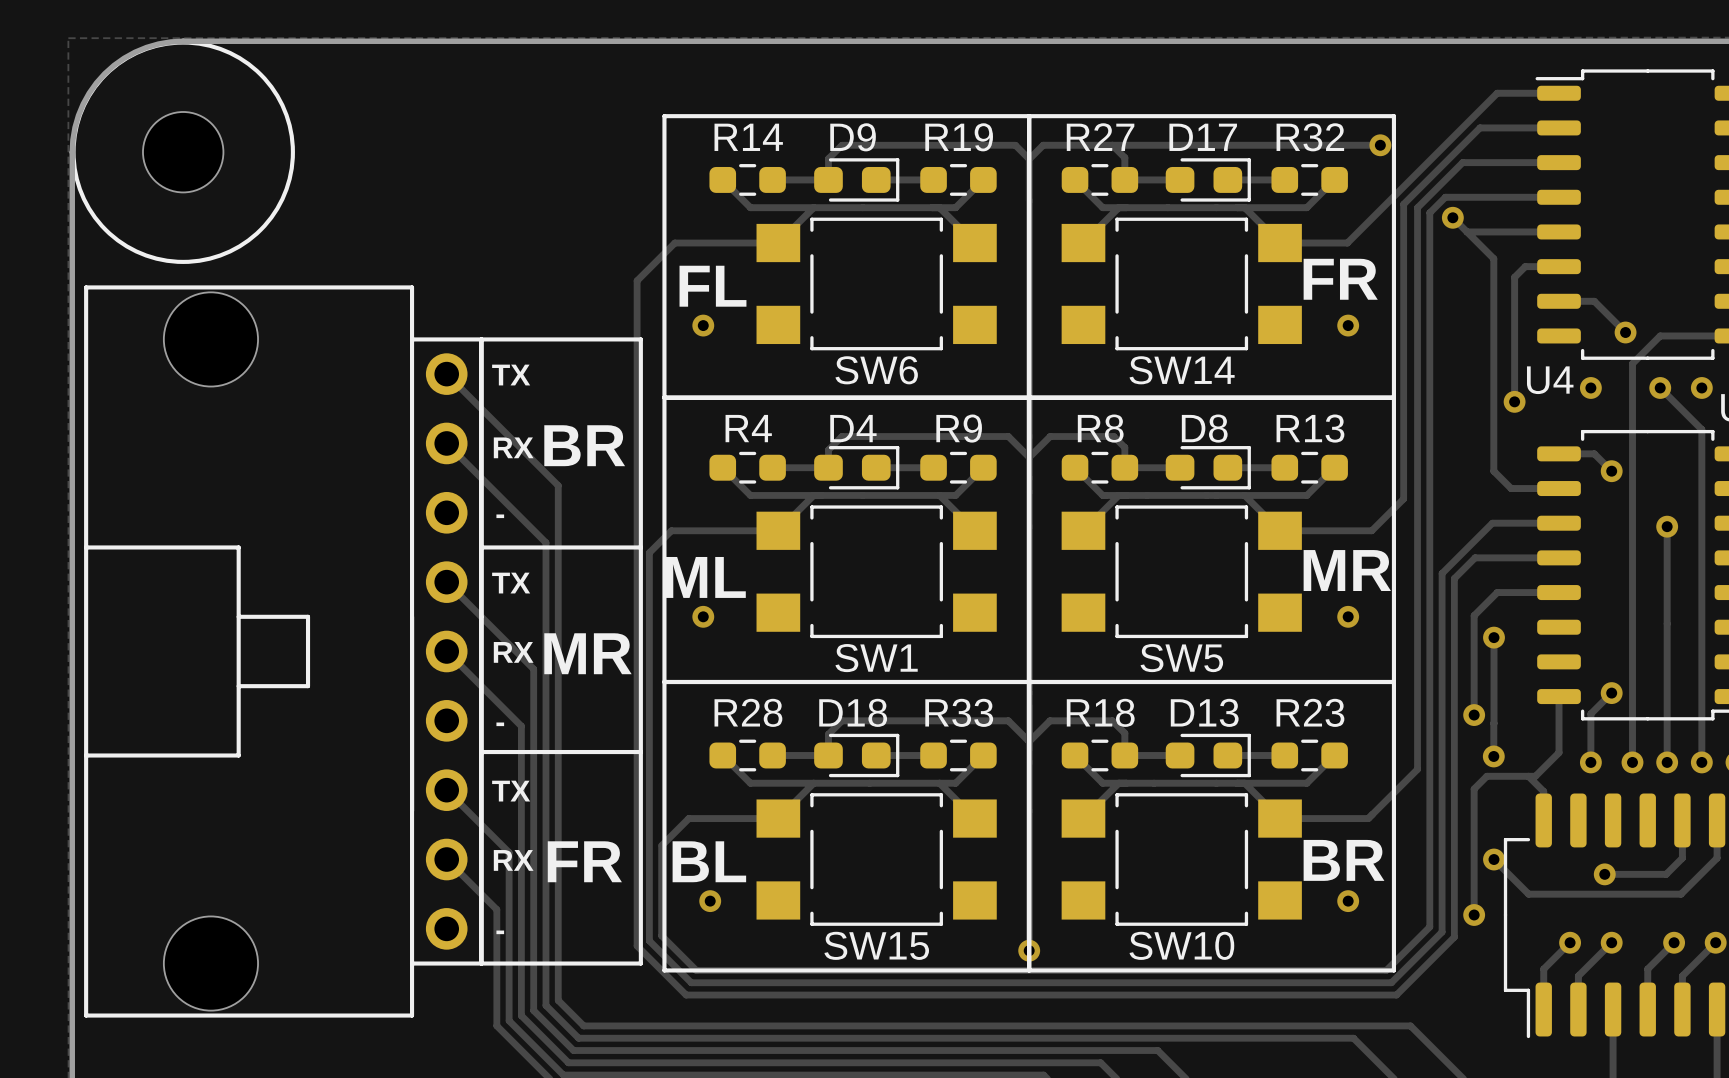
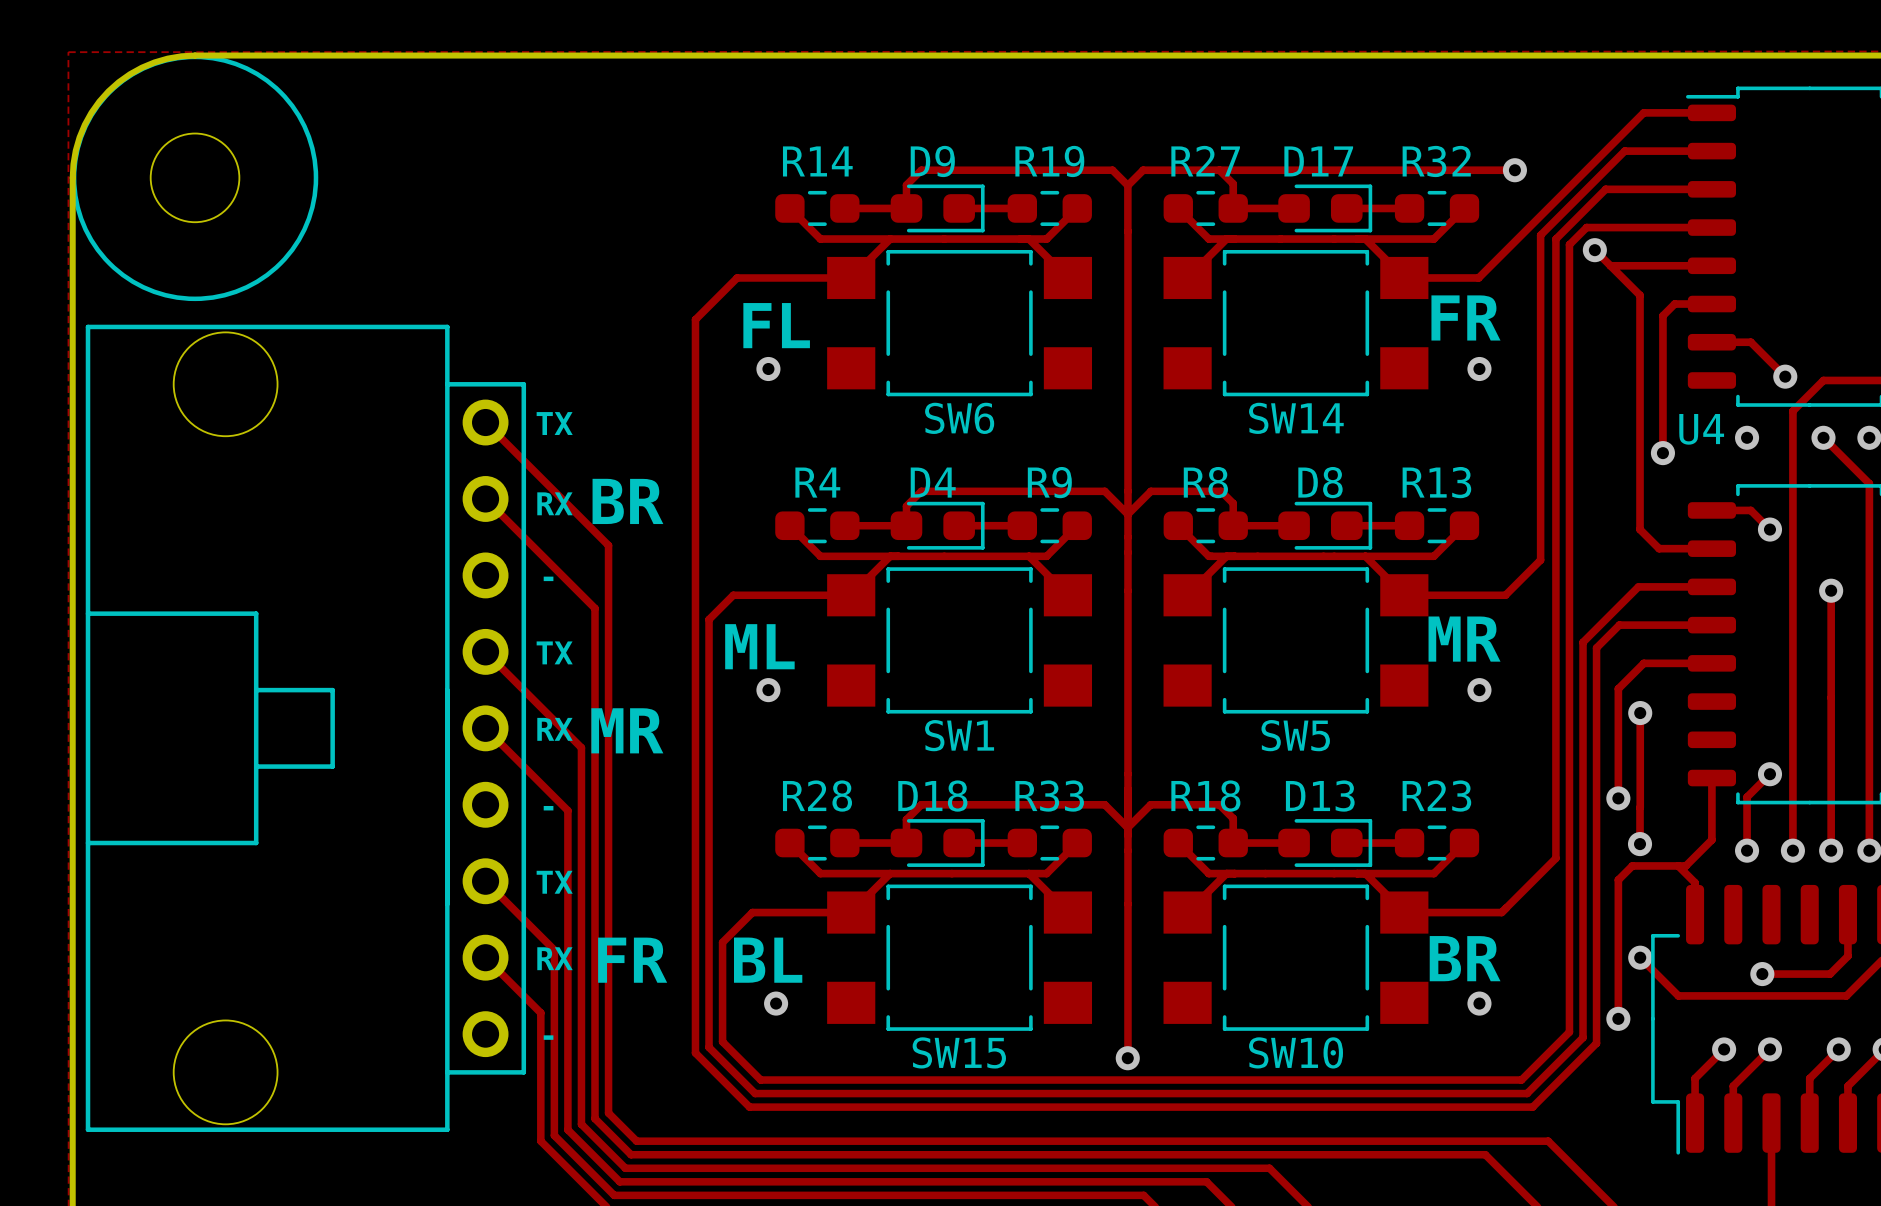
line: (664, 116) (664, 970) (1393, 970) (1393, 116) (664, 116) -> none
line: (1029, 116) (1029, 970) -> none
line: (481, 339) (640, 339) (640, 963) (481, 963) (481, 339) -> none
line: (664, 397) (1393, 397) -> none
line: (481, 547) (640, 547) -> none
line: (664, 681) (1393, 681) -> none
line: (481, 752) (640, 752) -> none

